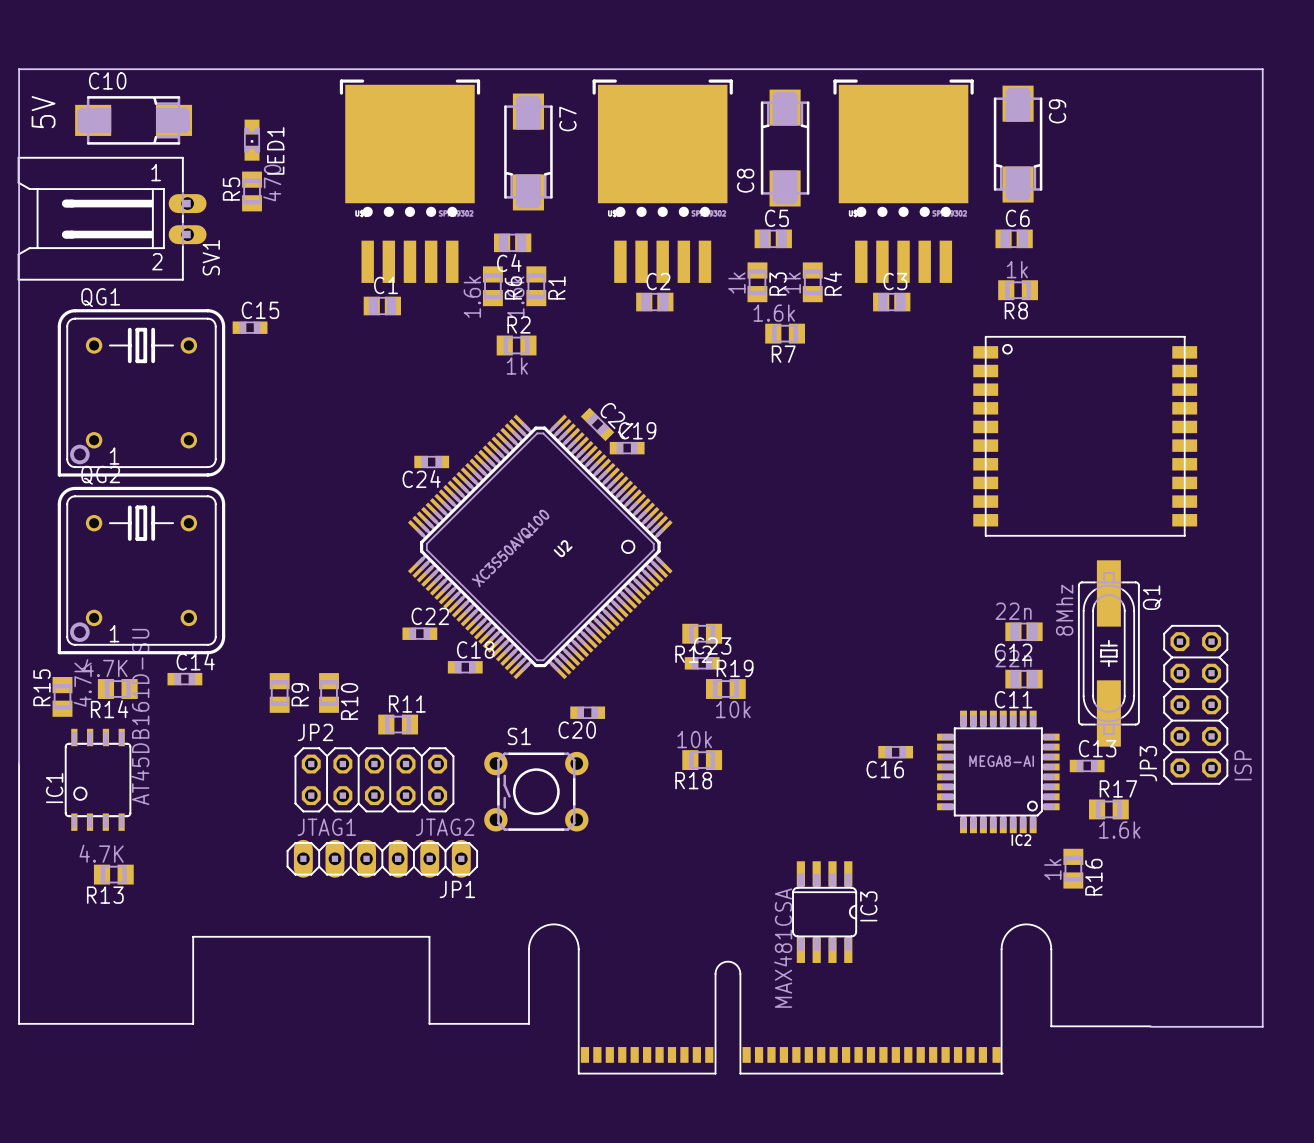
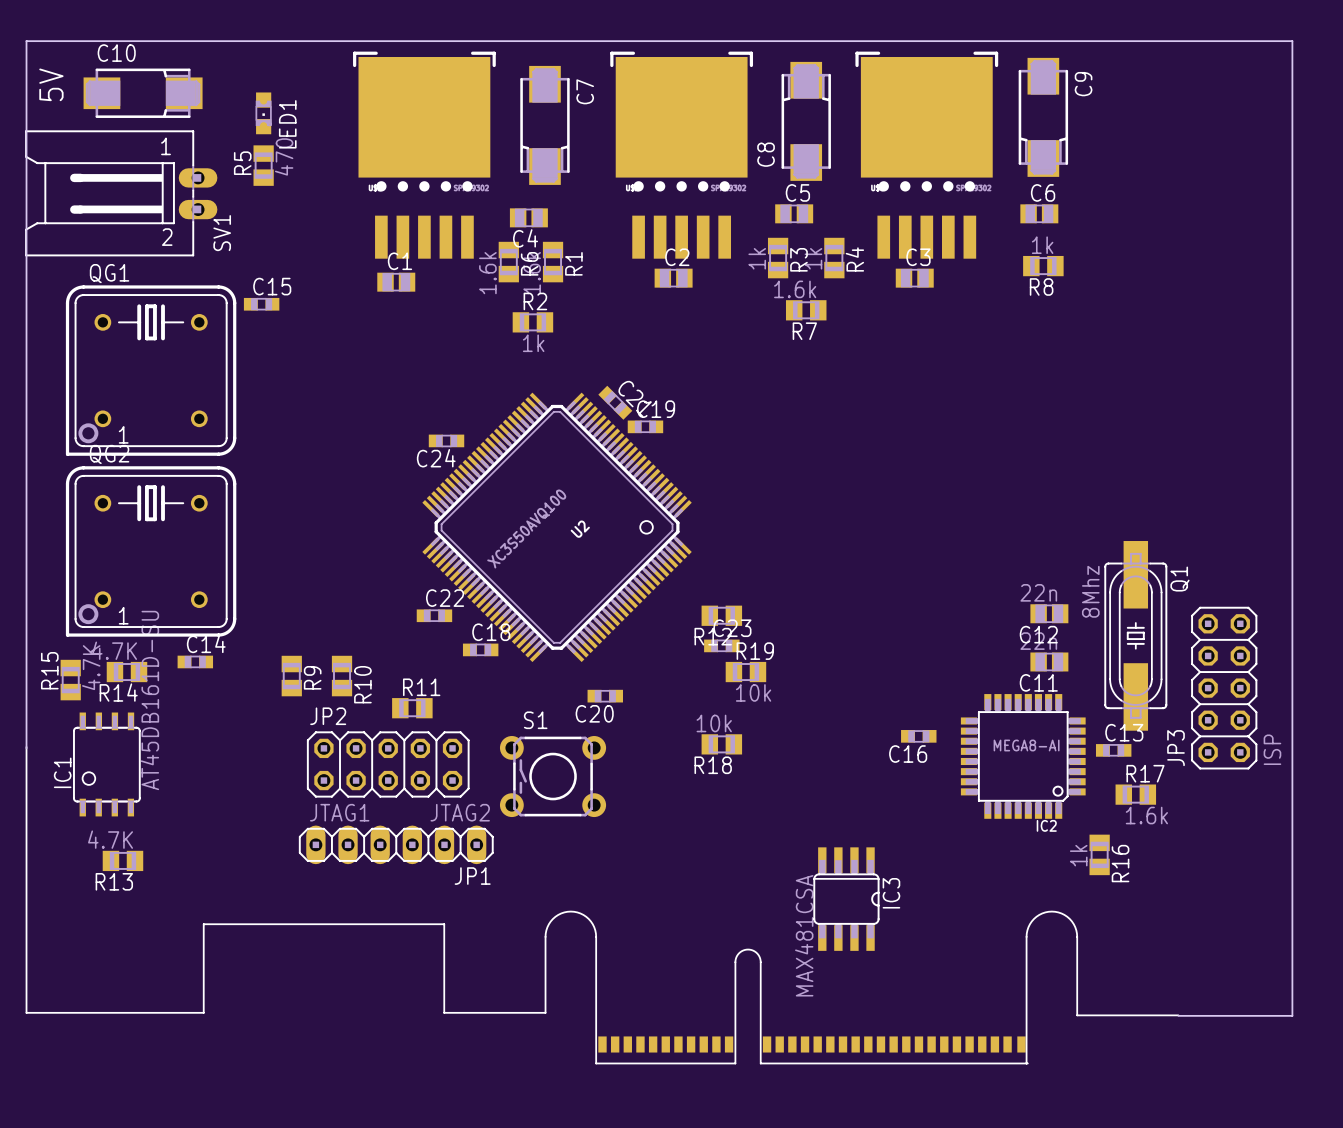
part: (1085, 436) -> none

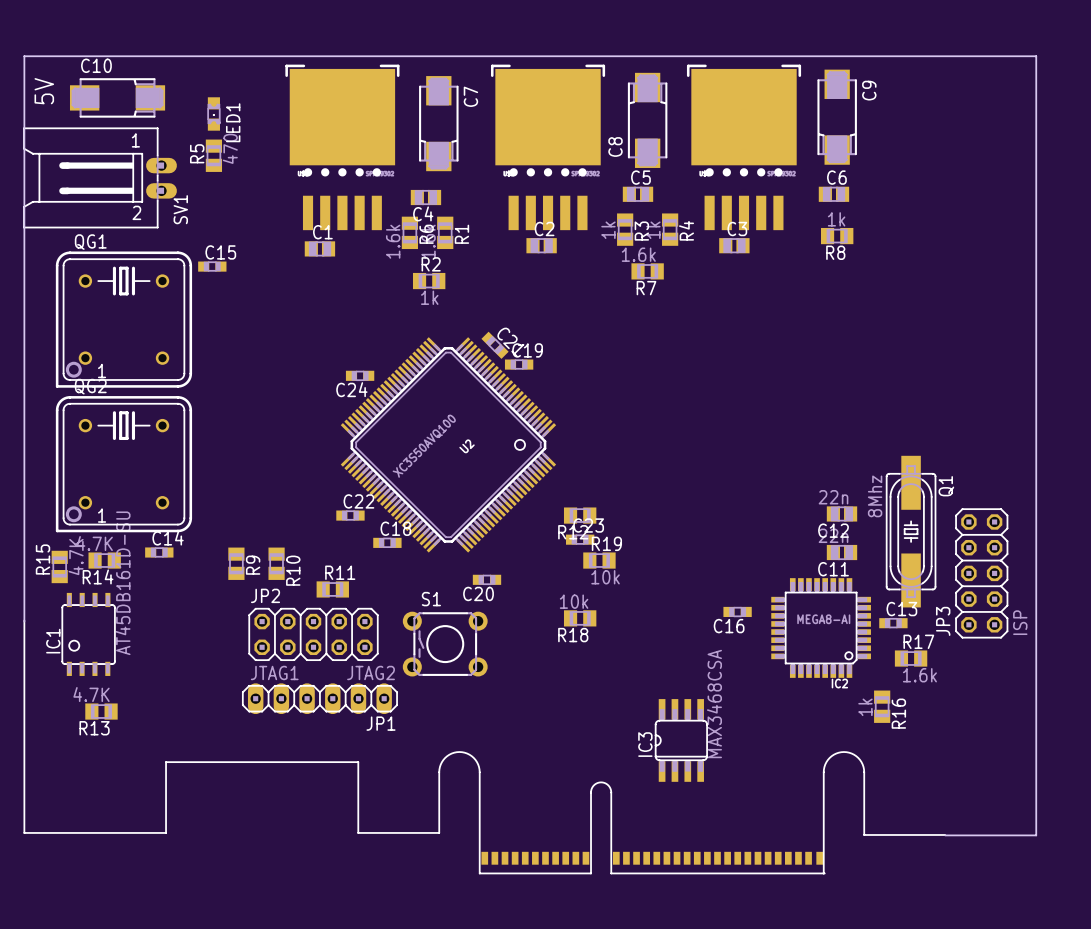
IC3 rotation: 0° (846, 899) -> 180° (681, 740)
IC3 value: MAX481CSA (804, 935) -> MAX3468CSA (714, 703)

